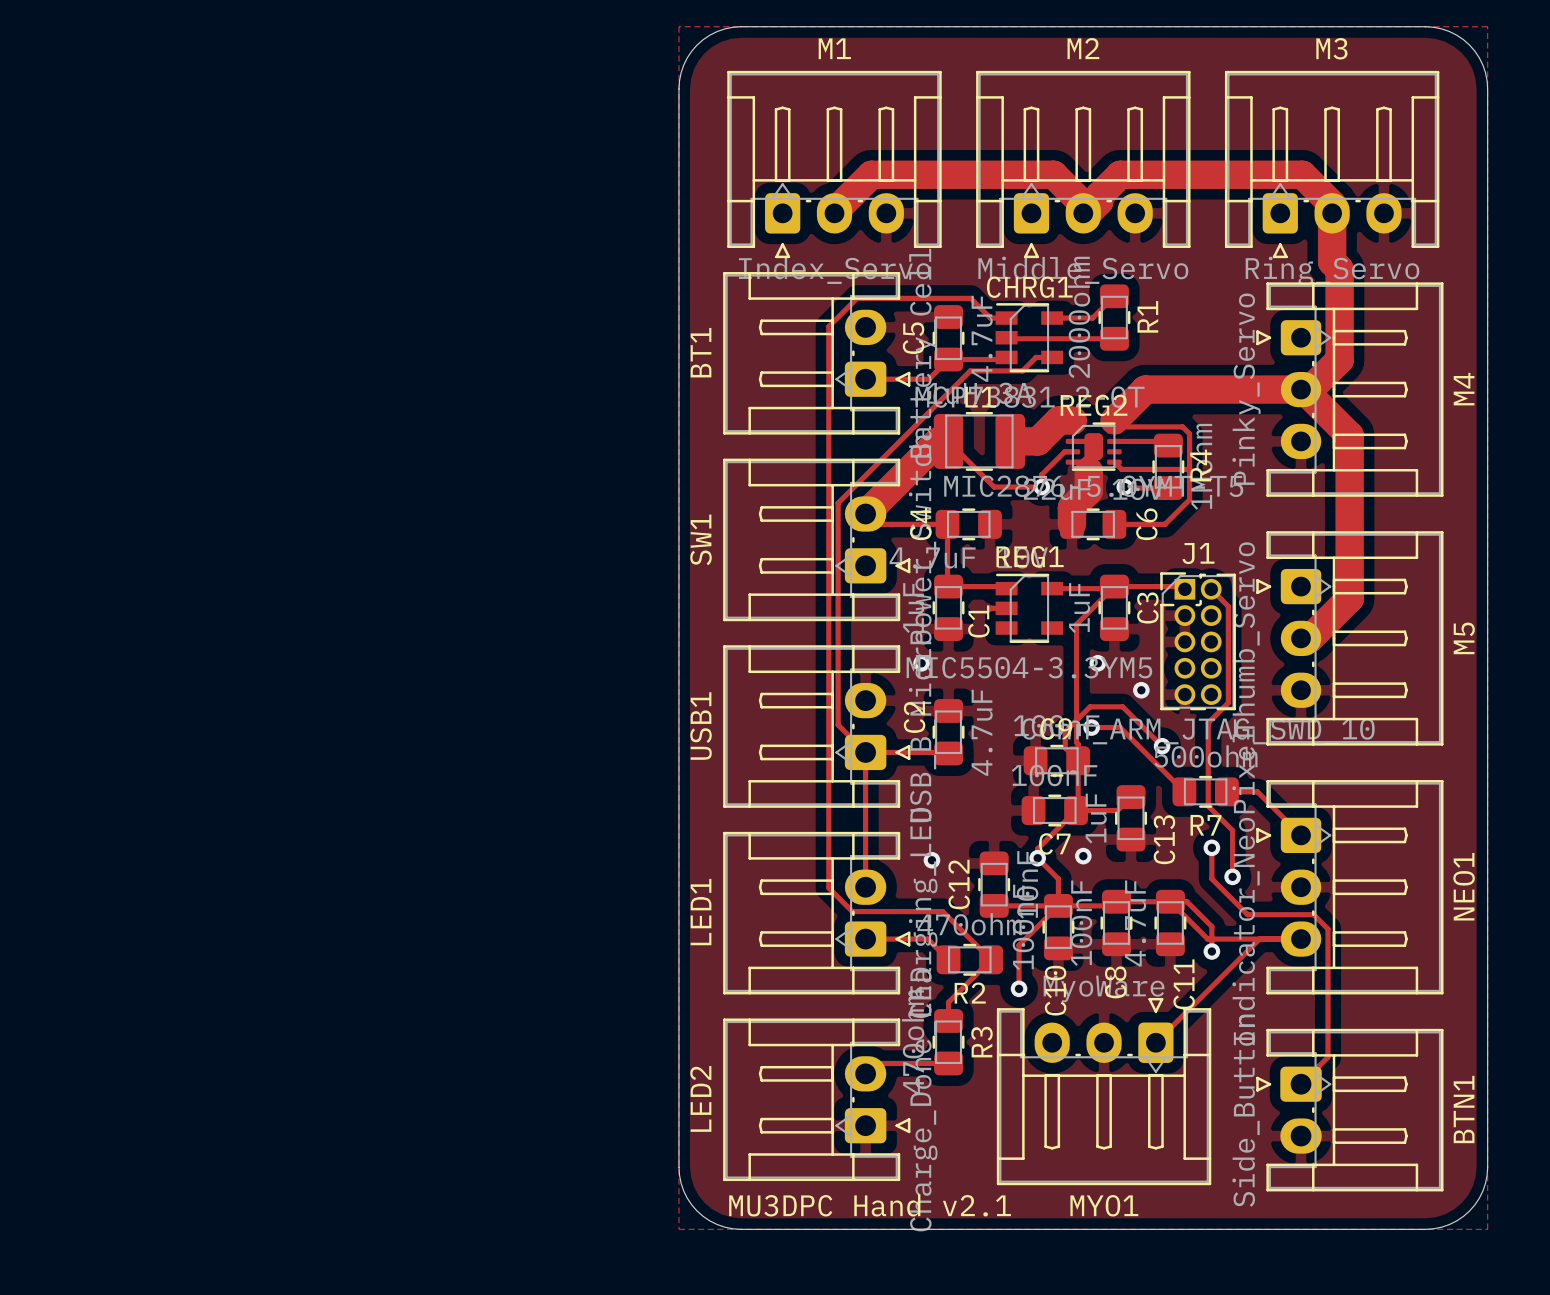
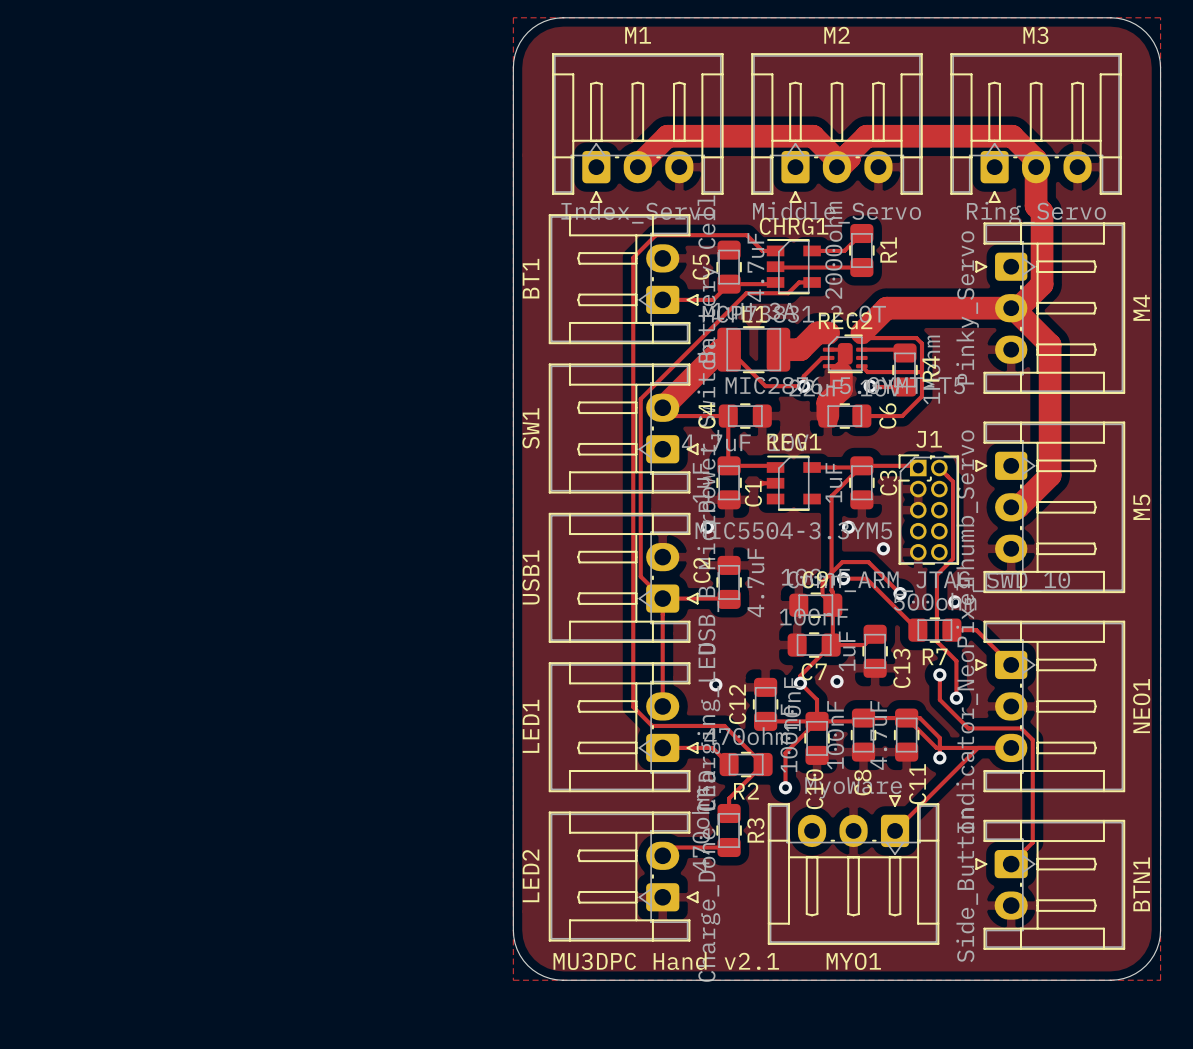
via: none -> (954, 601)

